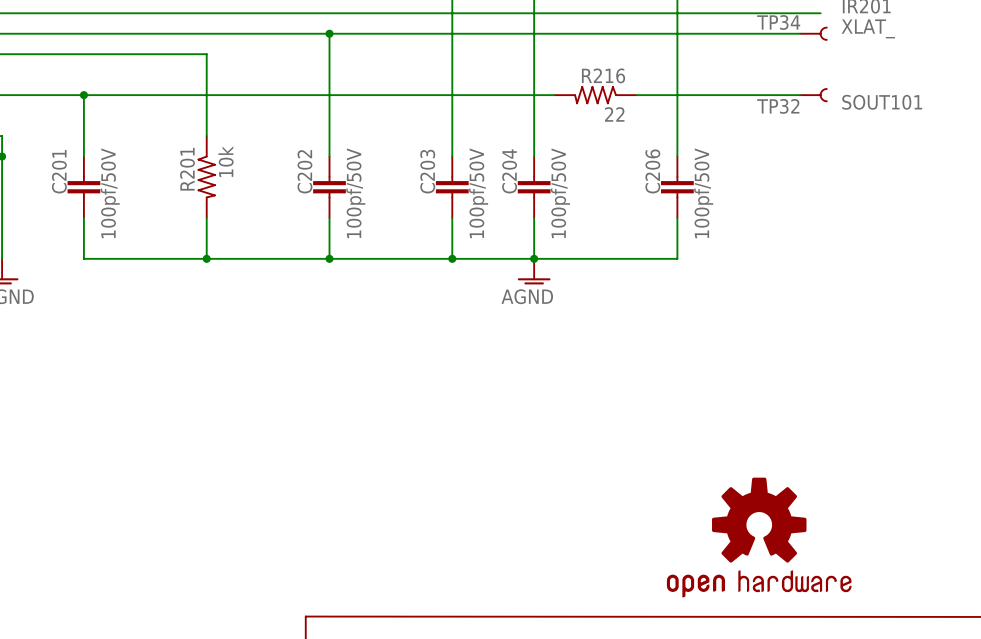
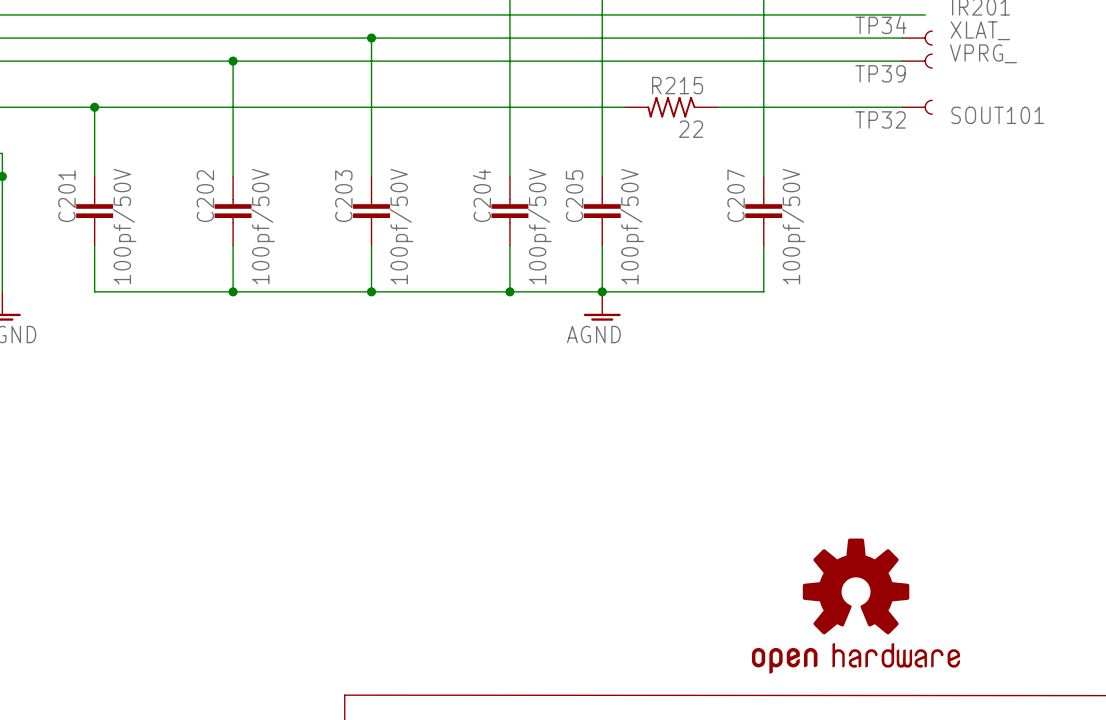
label: none -> VPRG_ (983, 53)
wire: none -> (233, 61) (902, 61)
junction: none -> (233, 61)
TP39: none -> (917, 61)
R216 name: R216 (603, 75) -> R215 (677, 85)
C202 name: C202 (304, 171) -> C203 (343, 196)
C203 name: C203 (427, 171) -> C204 (481, 195)
C204 name: C204 (509, 171) -> C205 (574, 196)
C206 name: C206 (652, 171) -> C207 (736, 195)
R201: 10k (206, 176) -> none
C202: none -> 100pf/50V (233, 211)

